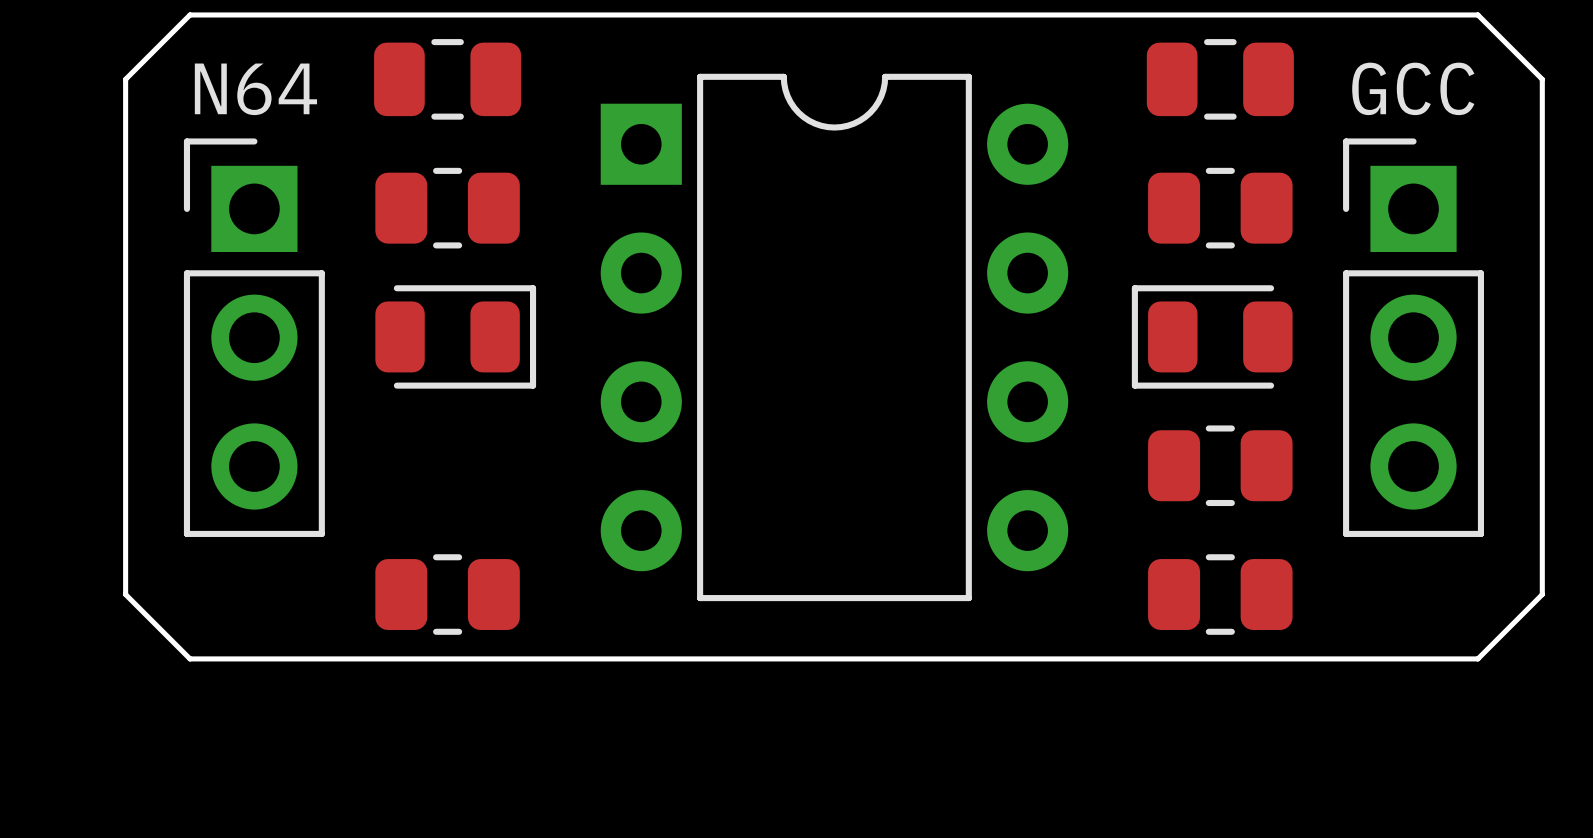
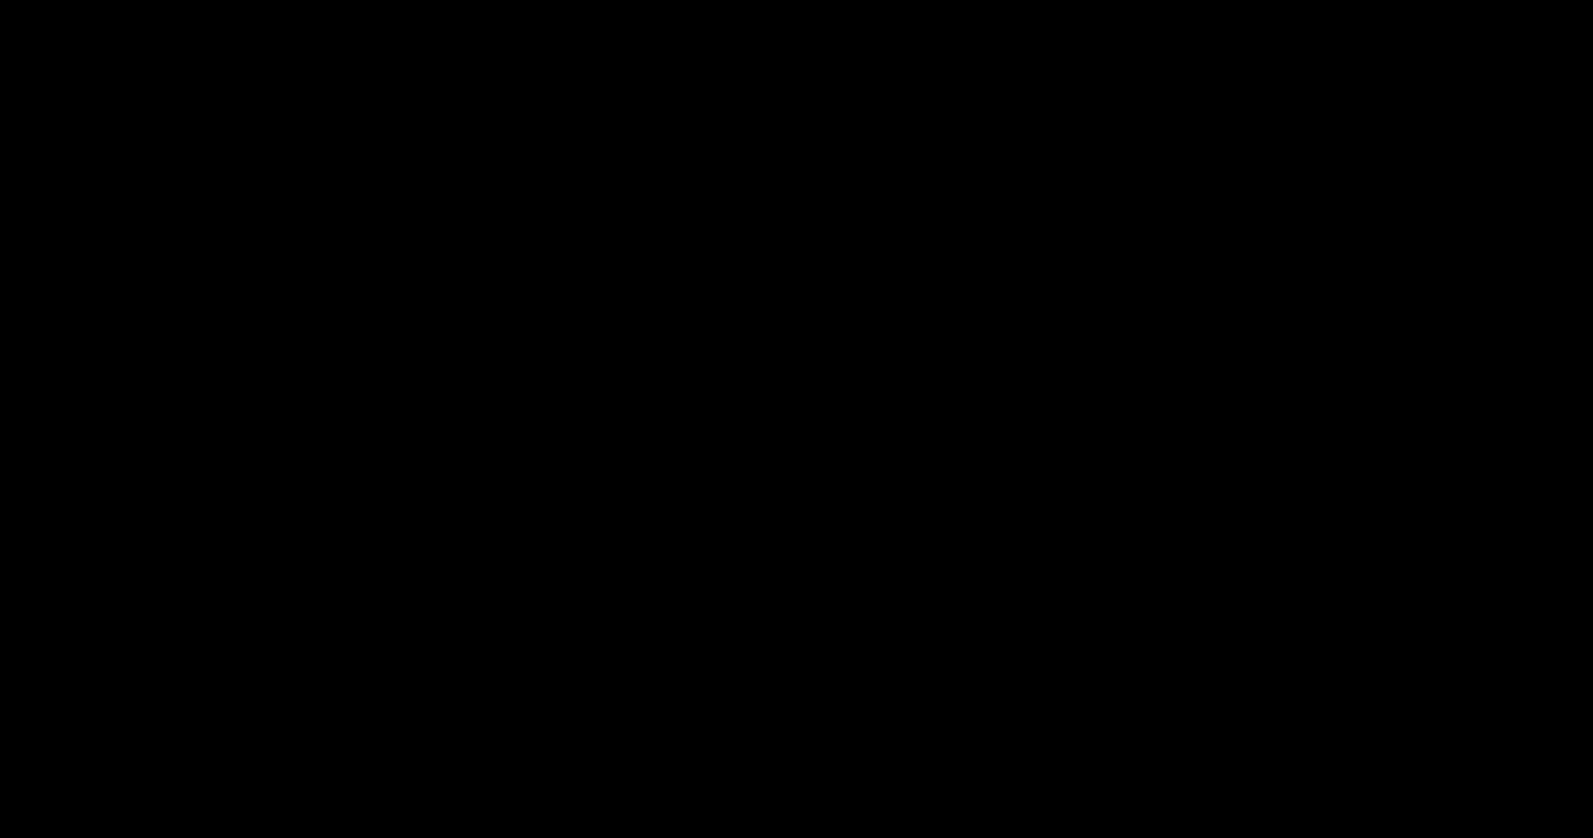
board edge: (190, 14) (125, 79) (125, 594) (190, 658) (1477, 658) (1542, 594) (1542, 79) (1477, 14) (190, 14) -> none
part: (447, 79) -> none
part: (1220, 79) -> none
part: (447, 208) -> none
part: (1220, 208) -> none
part: (455, 336) -> none
part: (1212, 336) -> none
N64: (254, 337) -> none
part: (834, 337) -> none
GCC: (1413, 337) -> none
part: (1220, 465) -> none
part: (447, 594) -> none
part: (1220, 594) -> none

